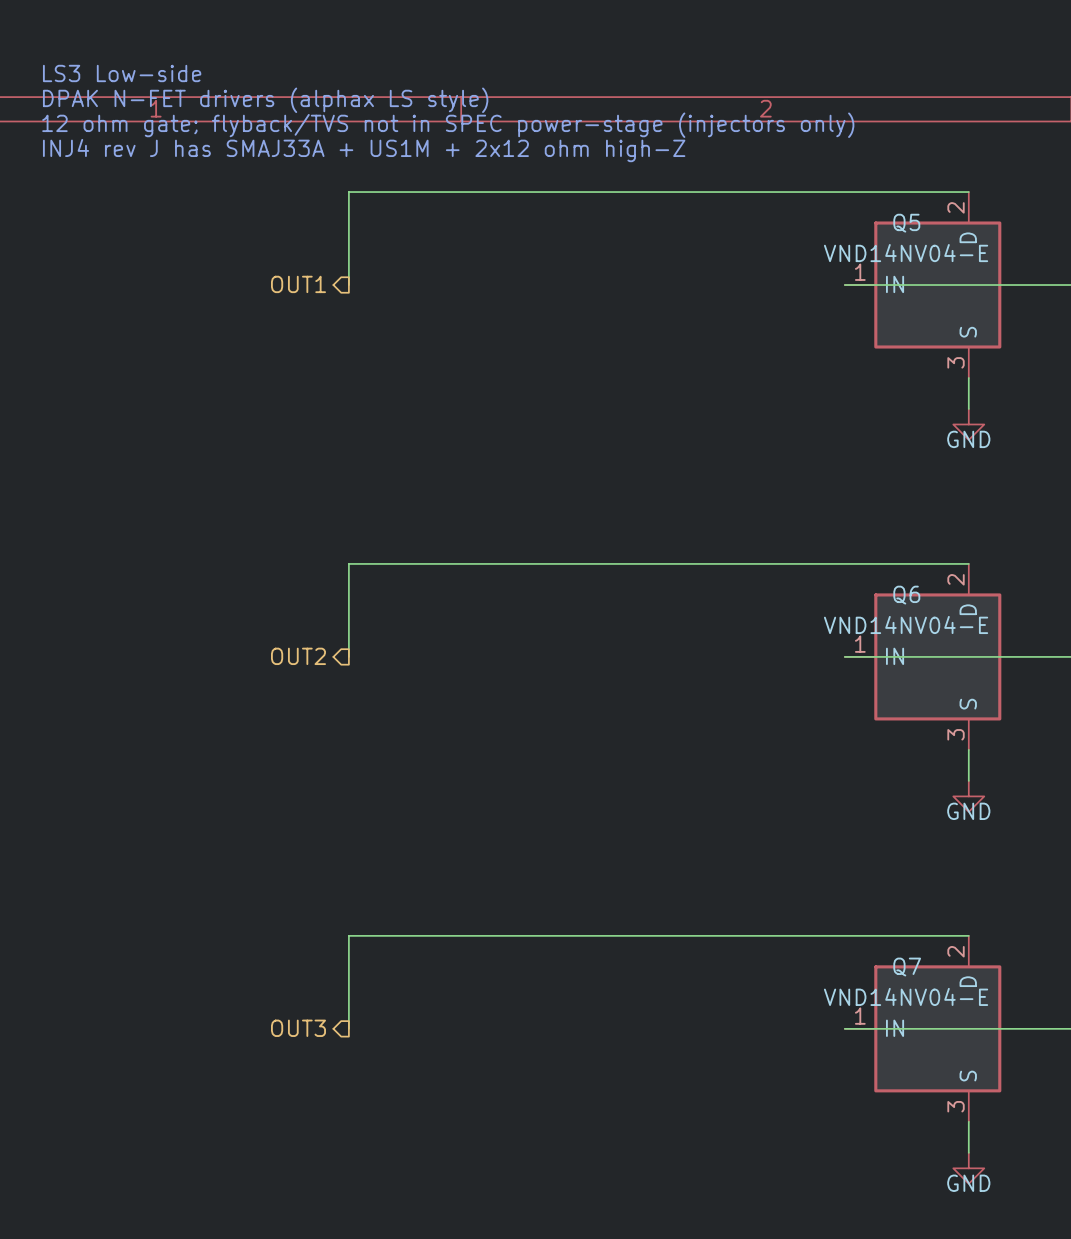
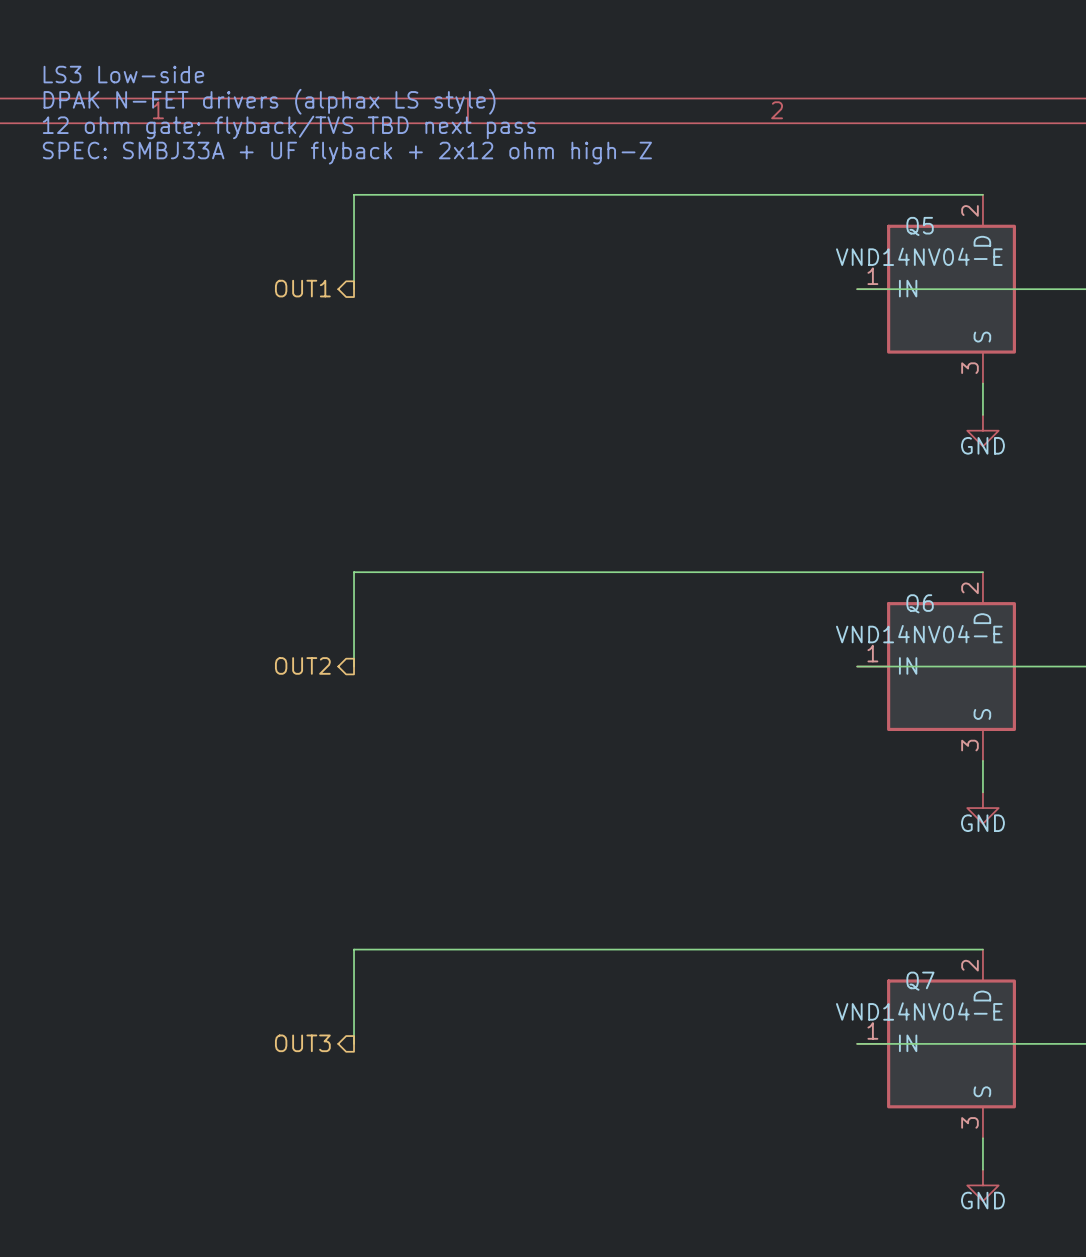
text: 12 ohm gate; flyback/TVS not in SPEC power-stage (injectors only) (448, 125) -> 12 ohm gate; flyback/TVS TBD next pass (289, 127)
text: INJ4 rev J has SMAJ33A + US1M + 2x12 ohm high-Z (364, 150) -> SPEC: SMBJ33A + UF flyback + 2x12 ohm high-Z (347, 153)

